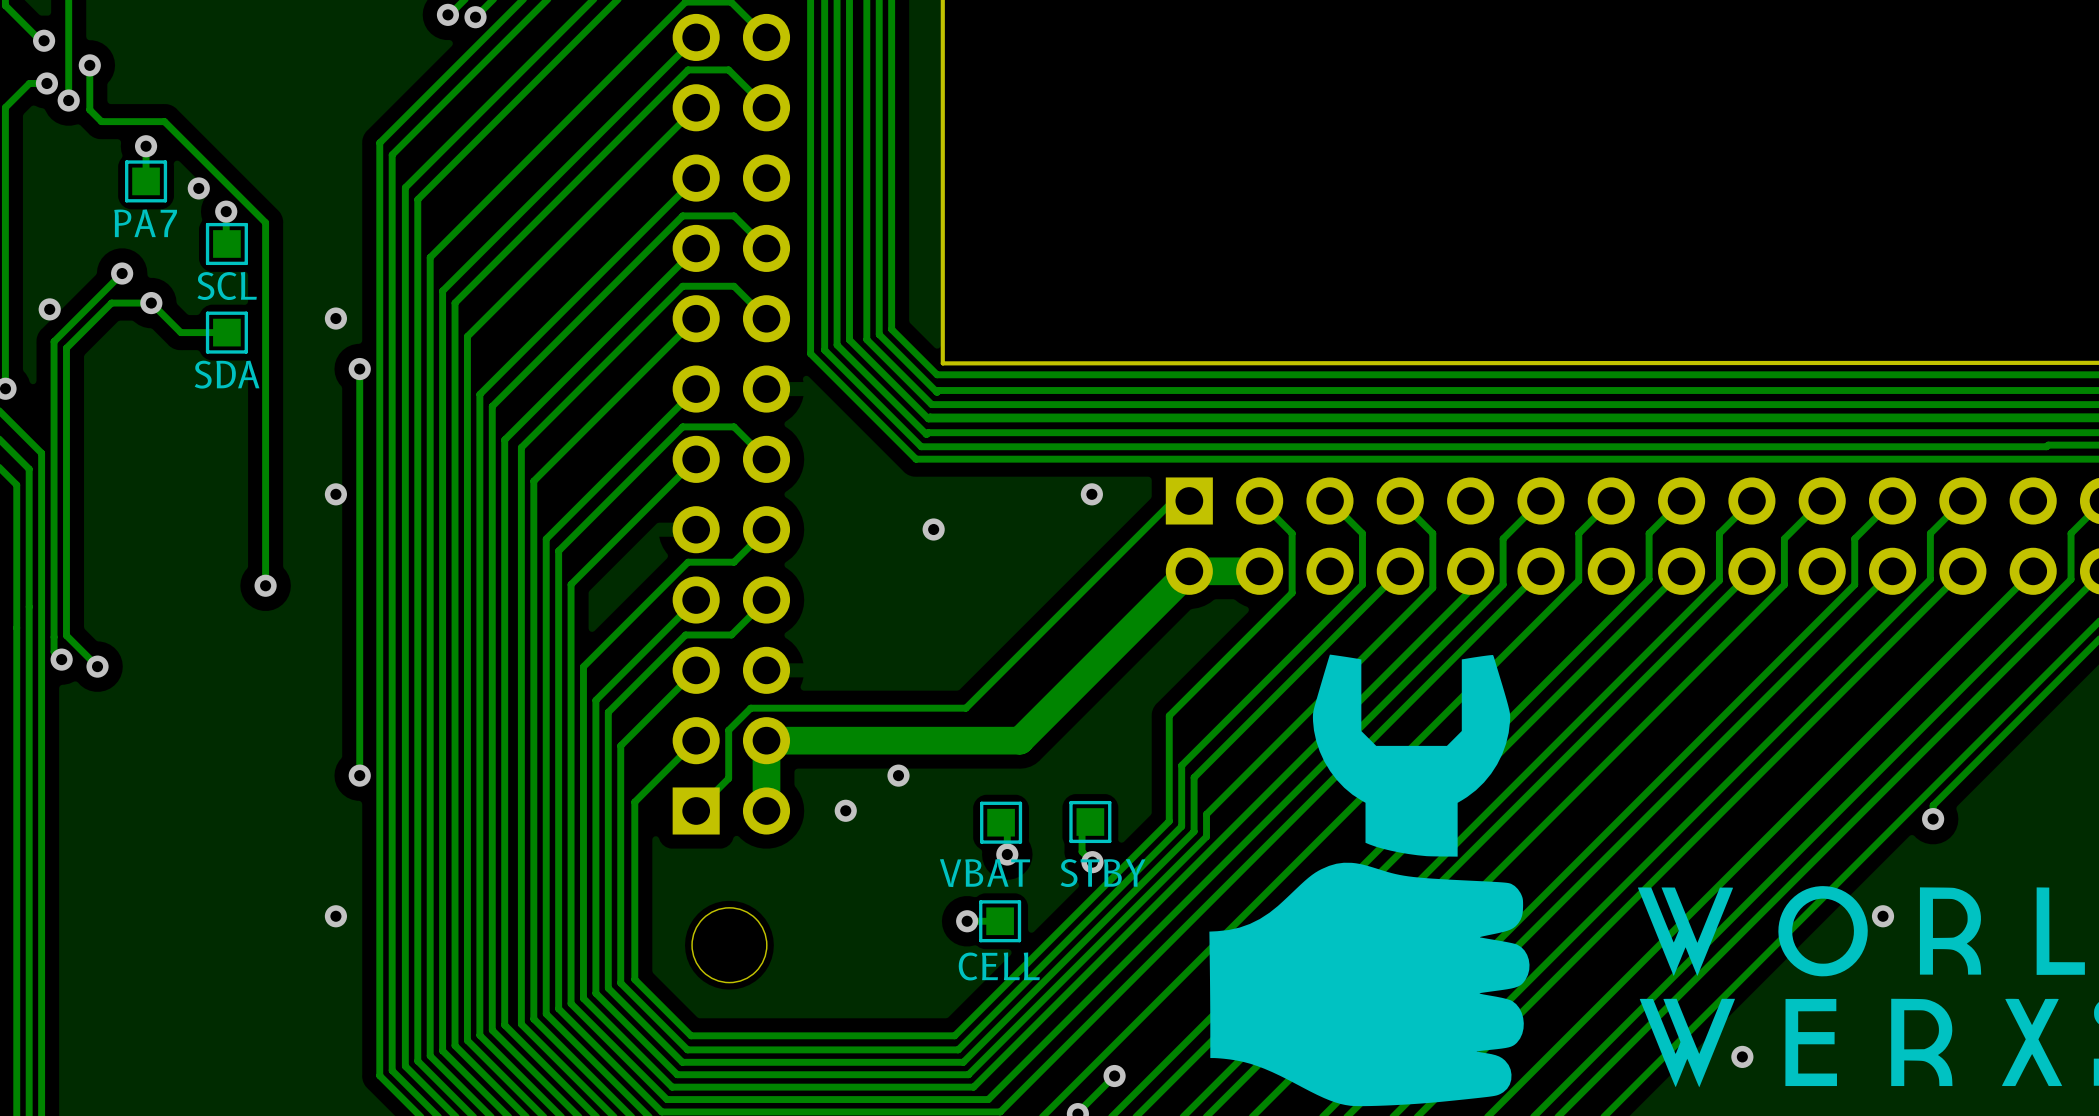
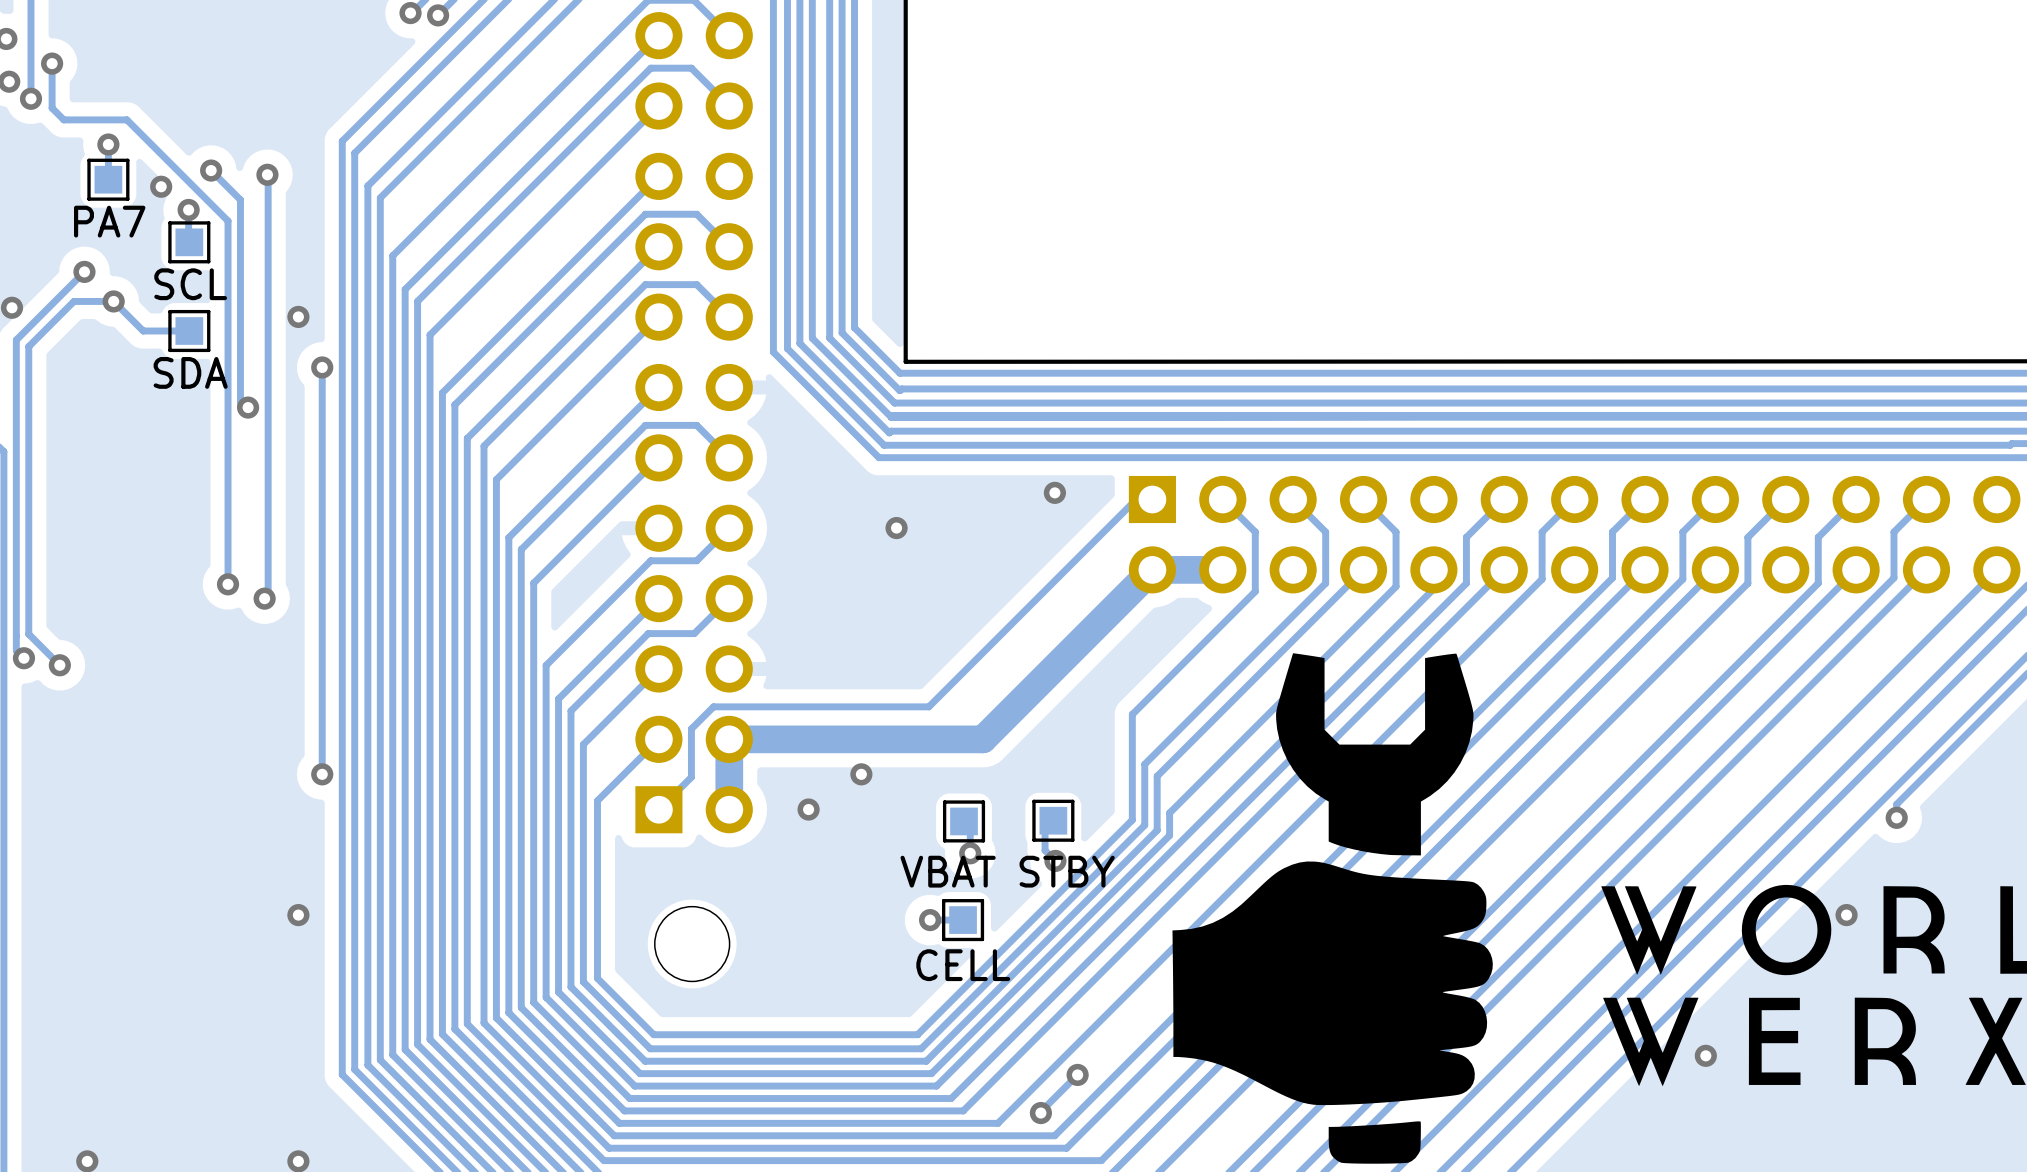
track: none -> (211, 170) (240, 199) (240, 405)
via: none -> (211, 170)
track: none -> (267, 174) (268, 595) (264, 598)
via: none -> (267, 174)
via: none -> (248, 407)
via: (335, 494) -> none
via: none -> (264, 598)

